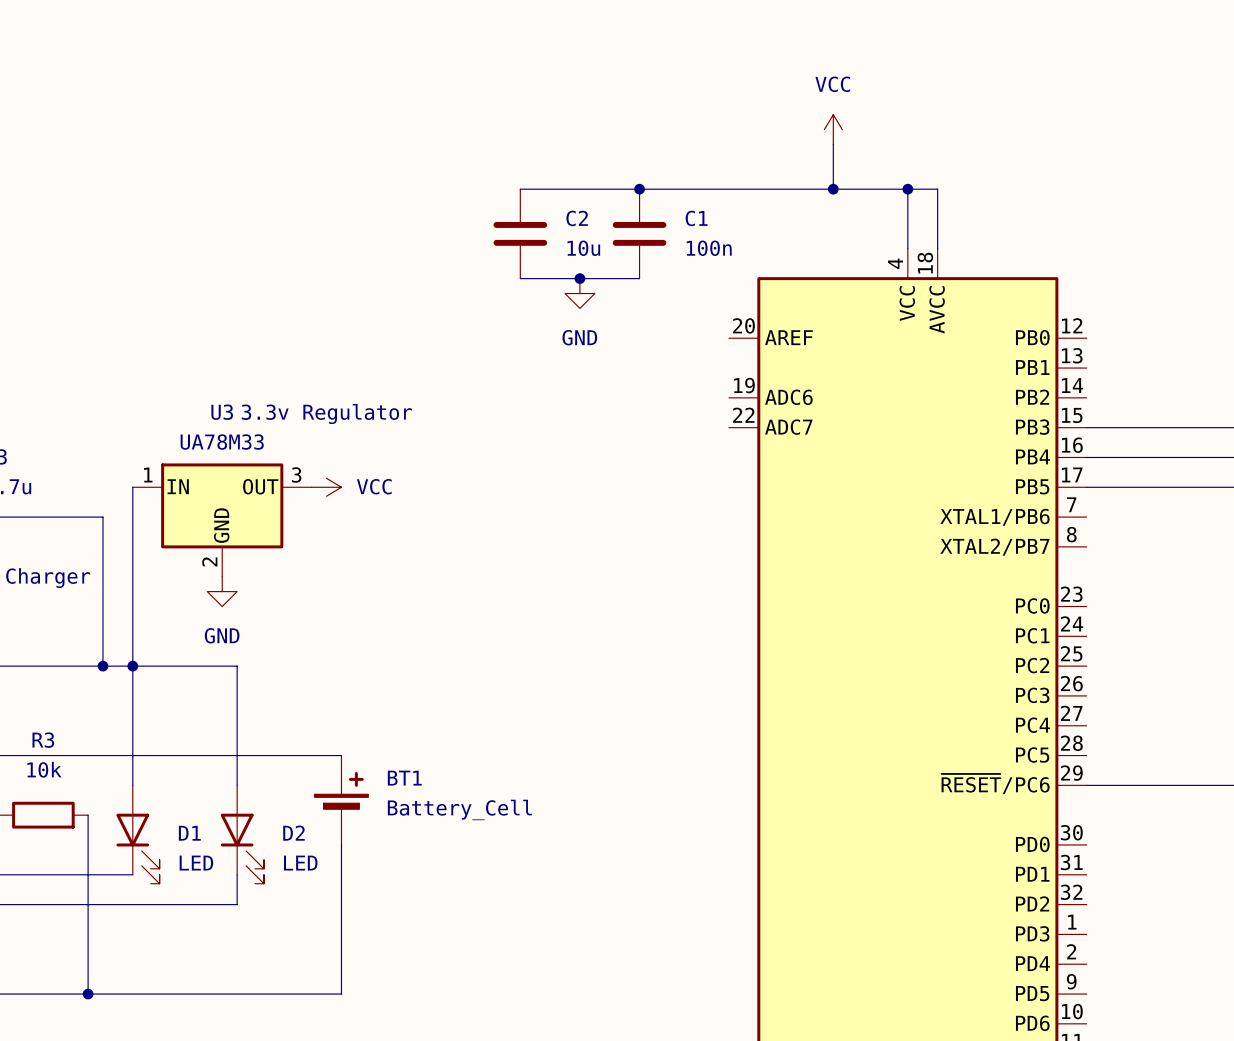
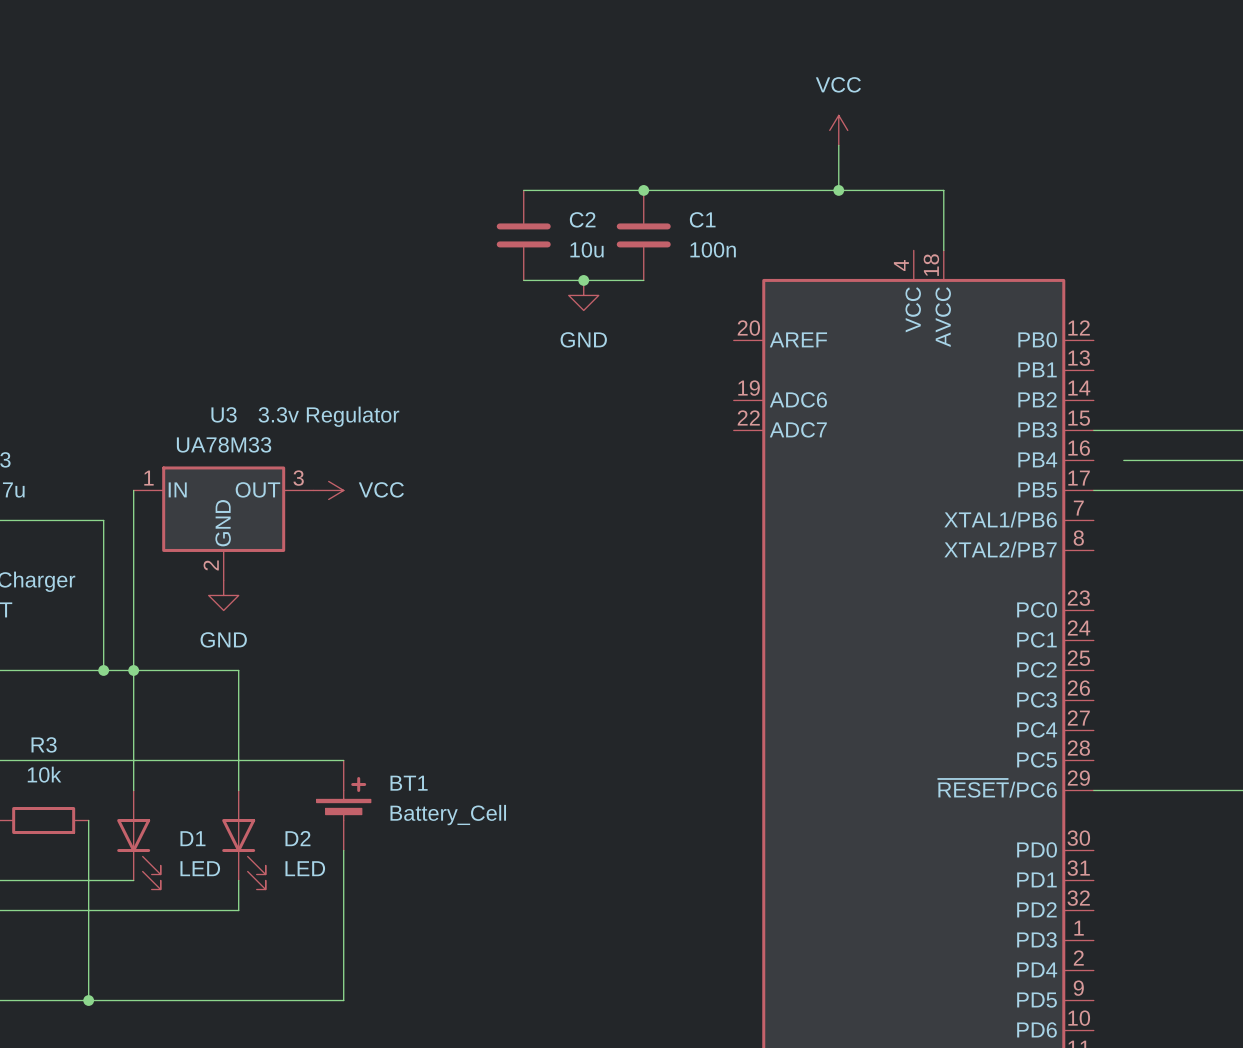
wire: (907, 189) (907, 248) -> none
junction: (907, 189) -> none
wire: (1086, 457) (1116, 457) -> none

